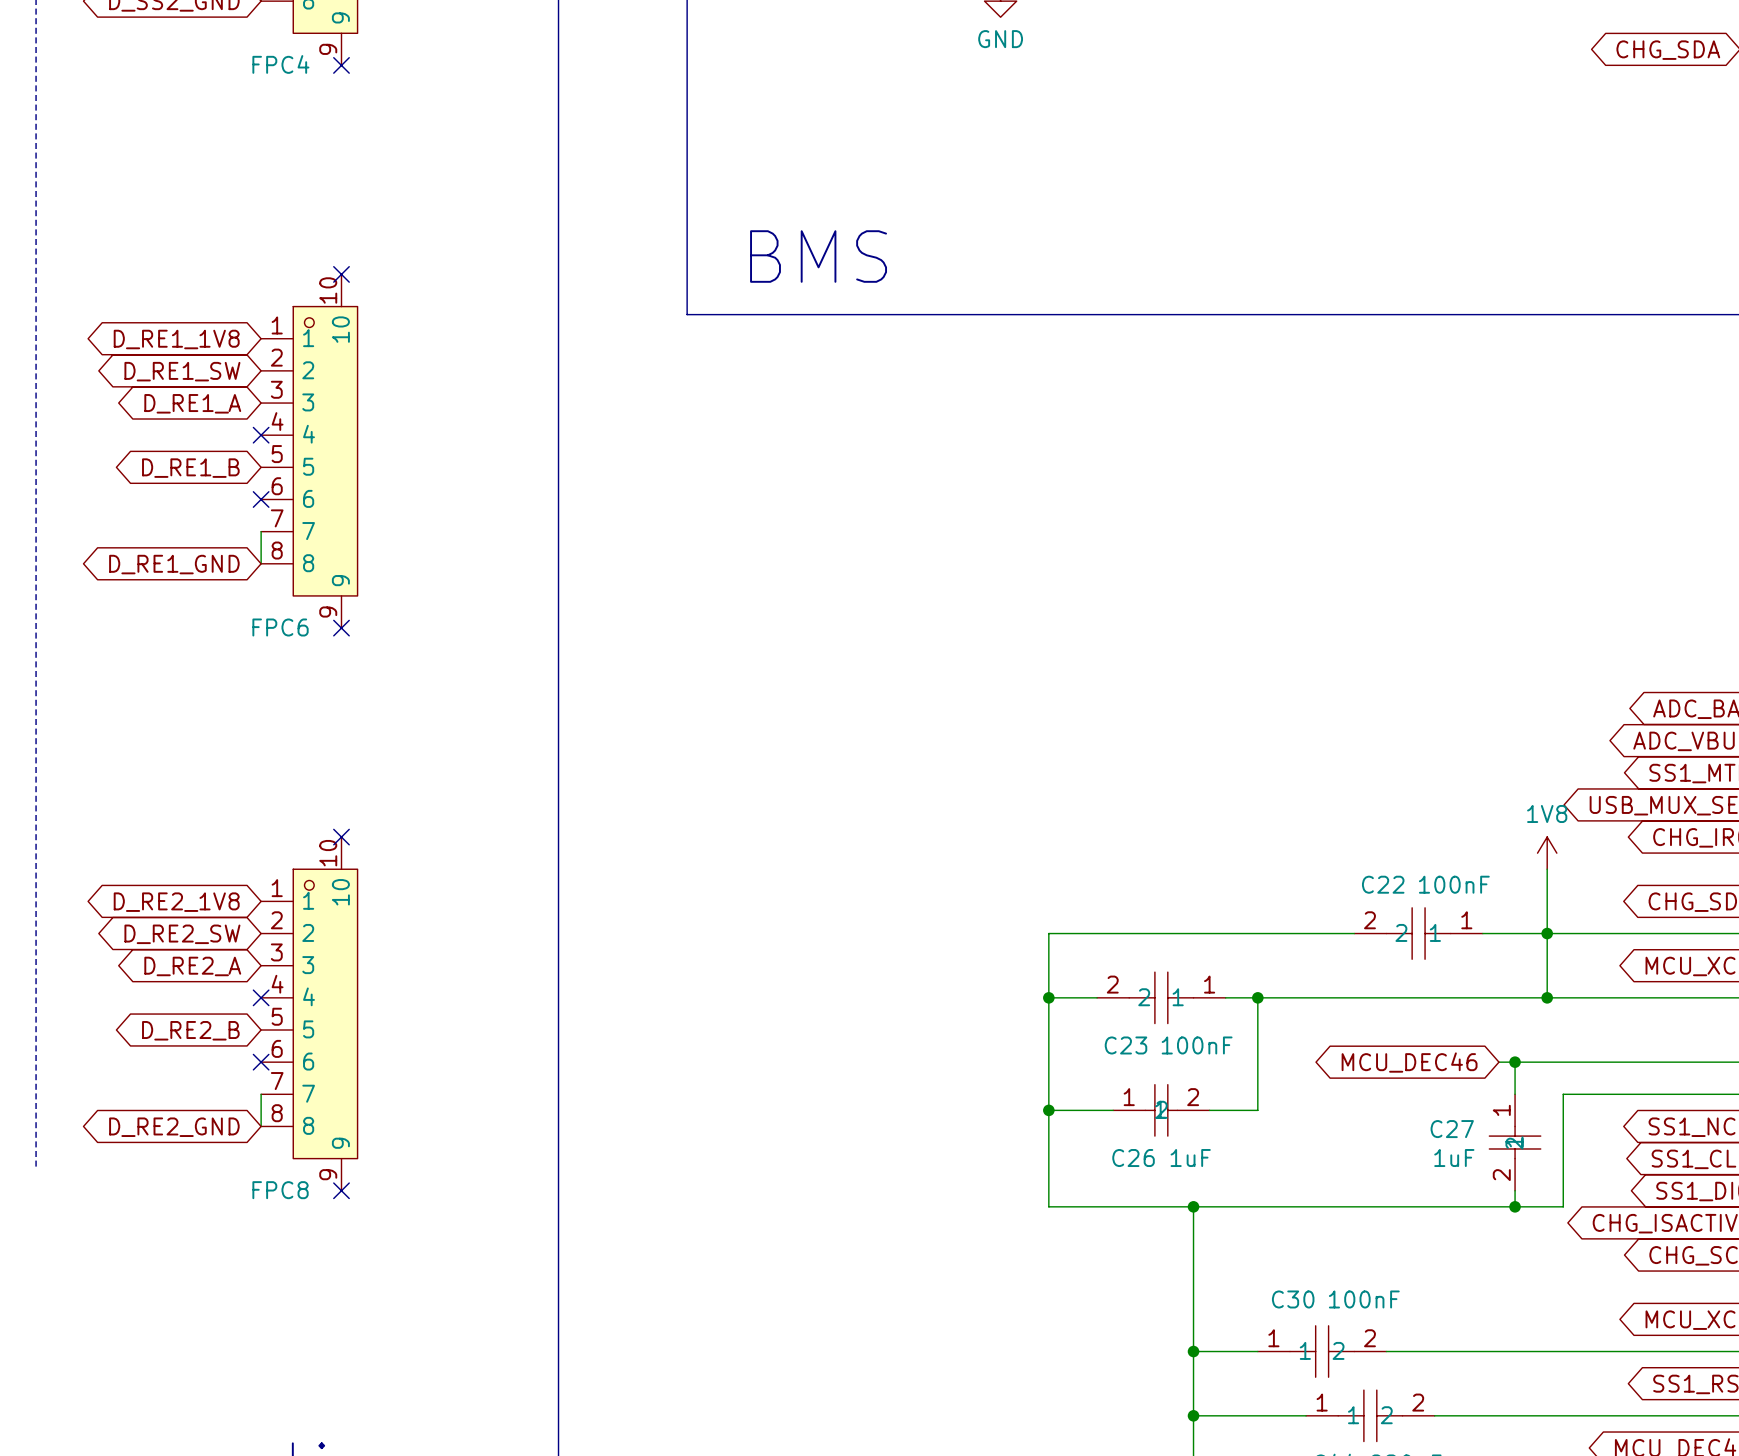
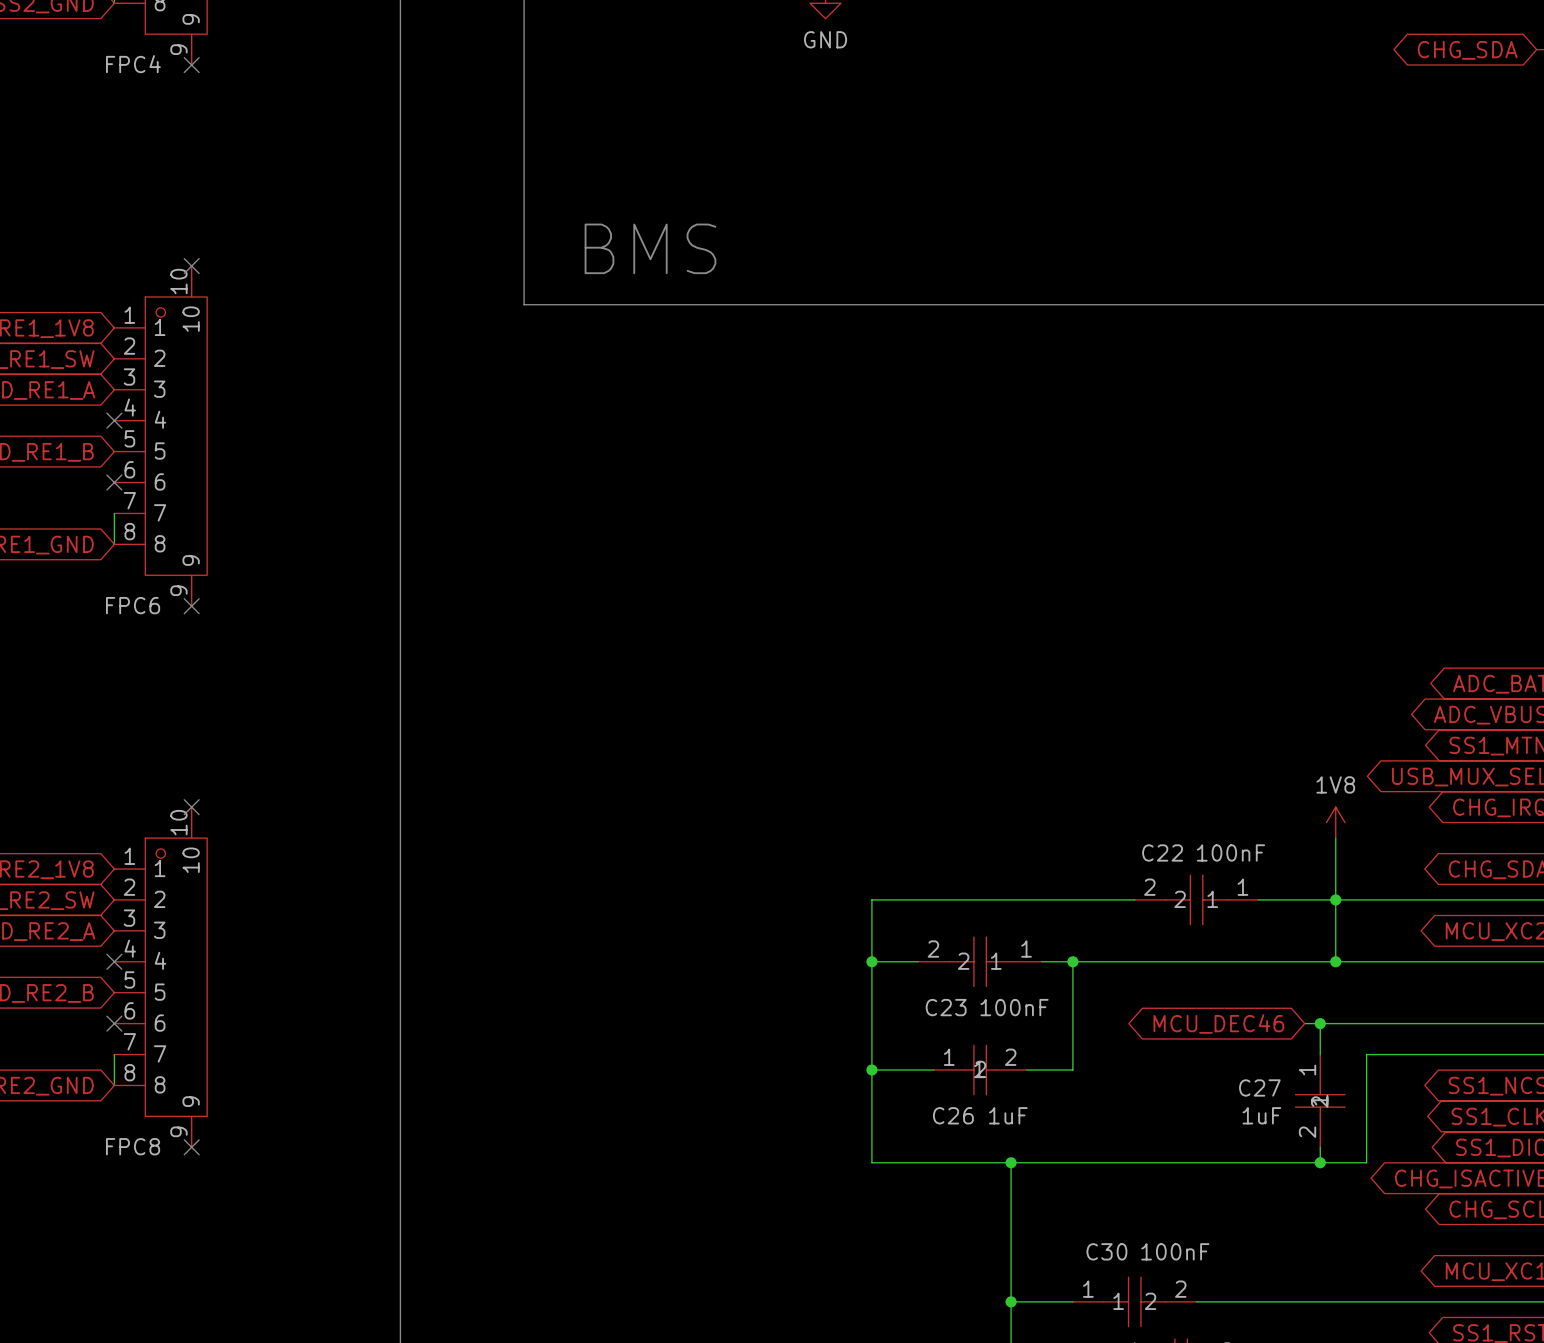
power symbol position: 1V8 (1547, 853) -> 1V8 (1335, 822)
wire: (1547, 869) (1547, 997) -> (1335, 838) (1335, 961)
C22 position: (1418, 933) -> (1196, 899)
junction position: (1547, 933) -> (1335, 899)
junction position: (1547, 997) -> (1335, 961)

